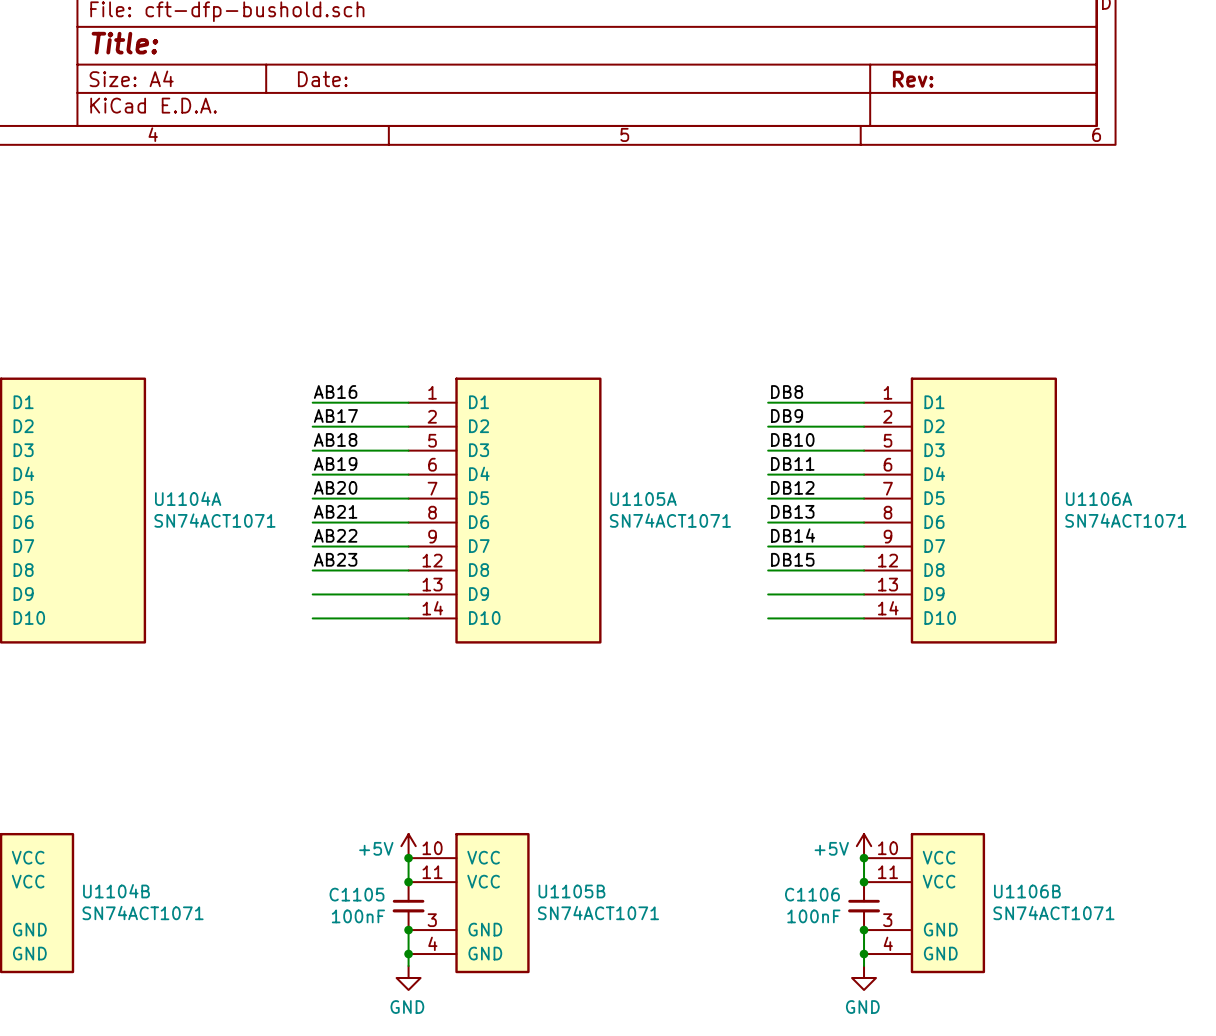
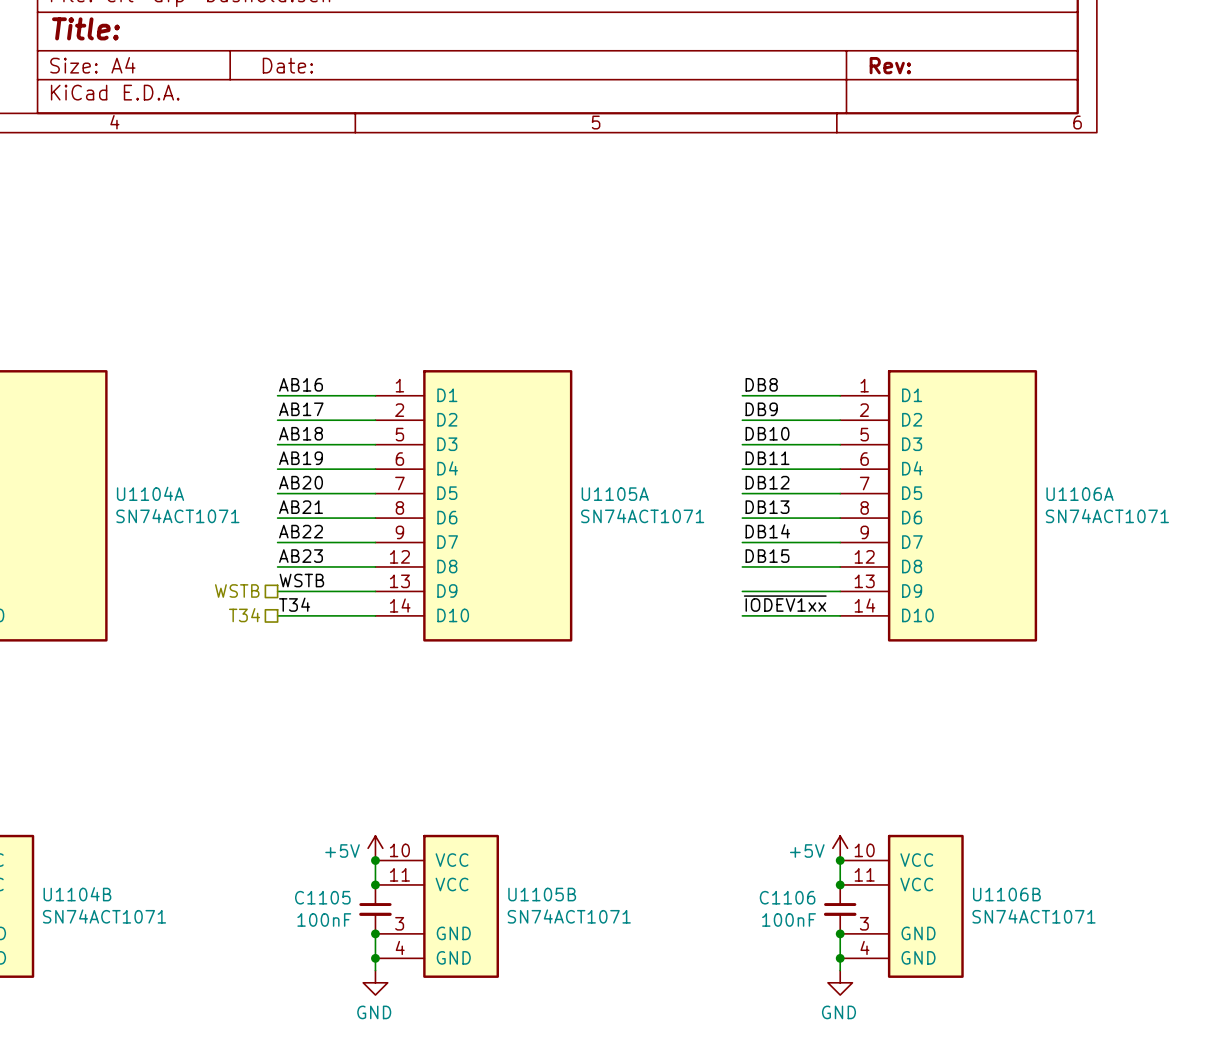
label: none -> WSTB (301, 580)
hierarchical label: none -> WSTB (237, 590)
label: none -> ~{IODEV1xx} (785, 603)
label: none -> T34 (294, 604)
hierarchical label: none -> T34 (244, 615)

